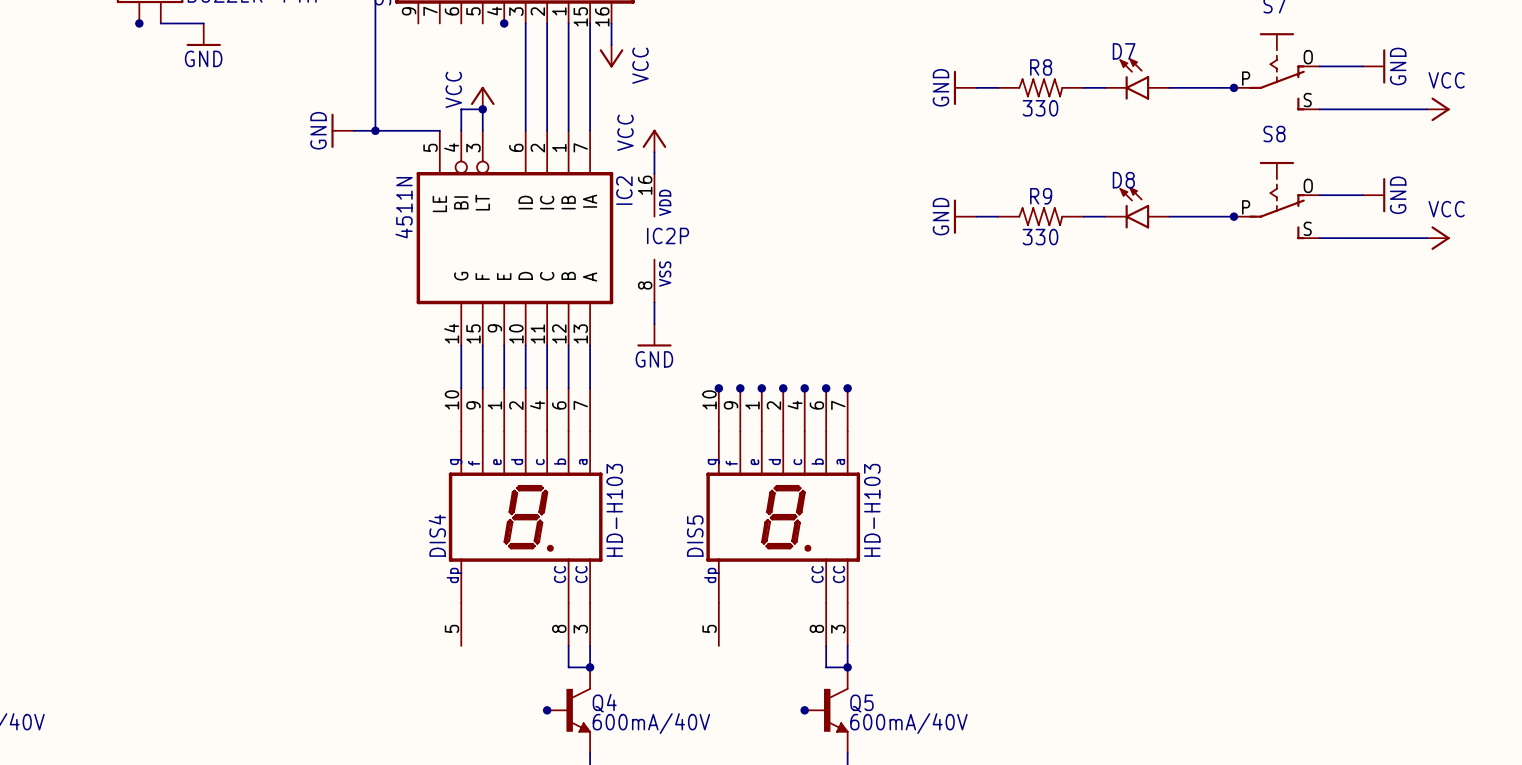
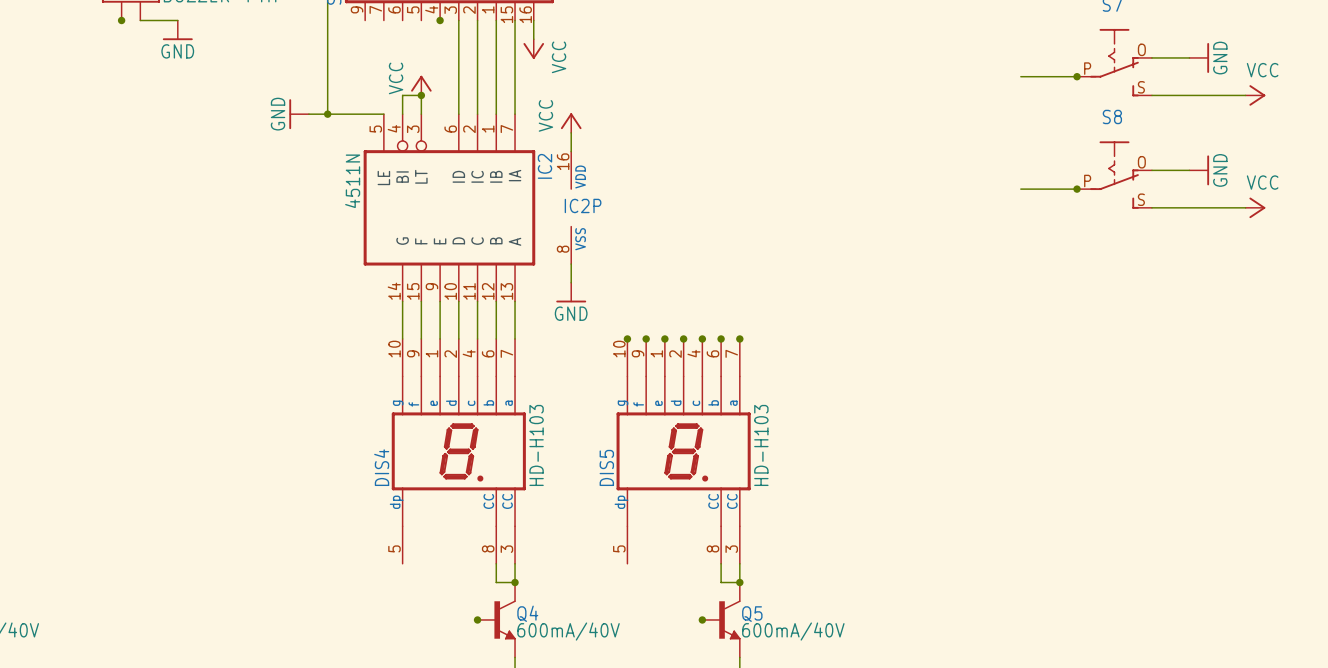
D7: (1137, 78) -> none
power symbol: GND (965, 87) -> none
wire: (976, 87) (997, 87) -> none
R8: 330 (1040, 87) -> none
wire: (1083, 87) (1105, 87) -> none
D8: (1137, 207) -> none
power symbol: GND (965, 216) -> none
wire: (976, 216) (997, 216) -> none
R9: 330 (1040, 216) -> none
wire: (1083, 216) (1105, 216) -> none

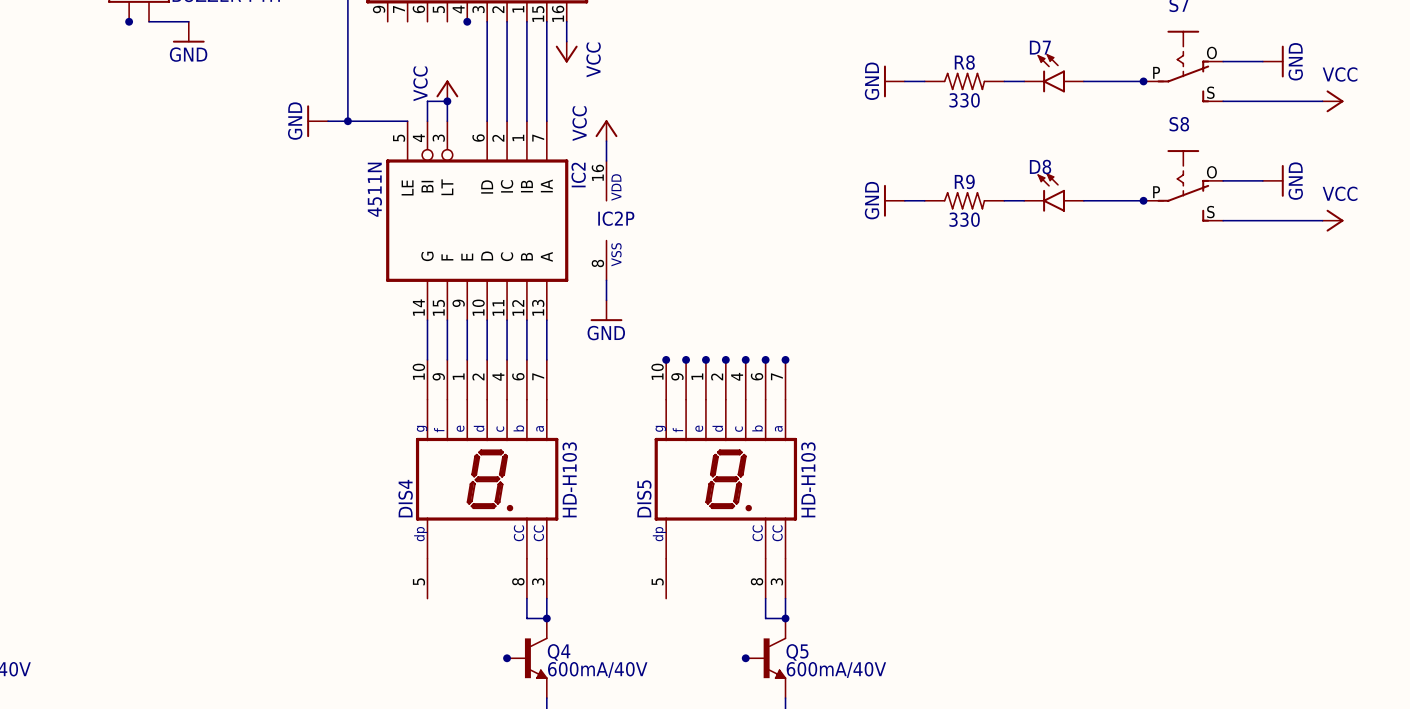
D7: none -> (1054, 73)
power symbol: none -> GND (894, 81)
wire: none -> (904, 81) (924, 81)
R8: none -> 330 (964, 81)
wire: none -> (1004, 81) (1024, 81)
D8: none -> (1054, 192)
power symbol: none -> GND (894, 200)
wire: none -> (904, 200) (924, 200)
R9: none -> 330 (964, 200)
wire: none -> (1004, 200) (1024, 200)

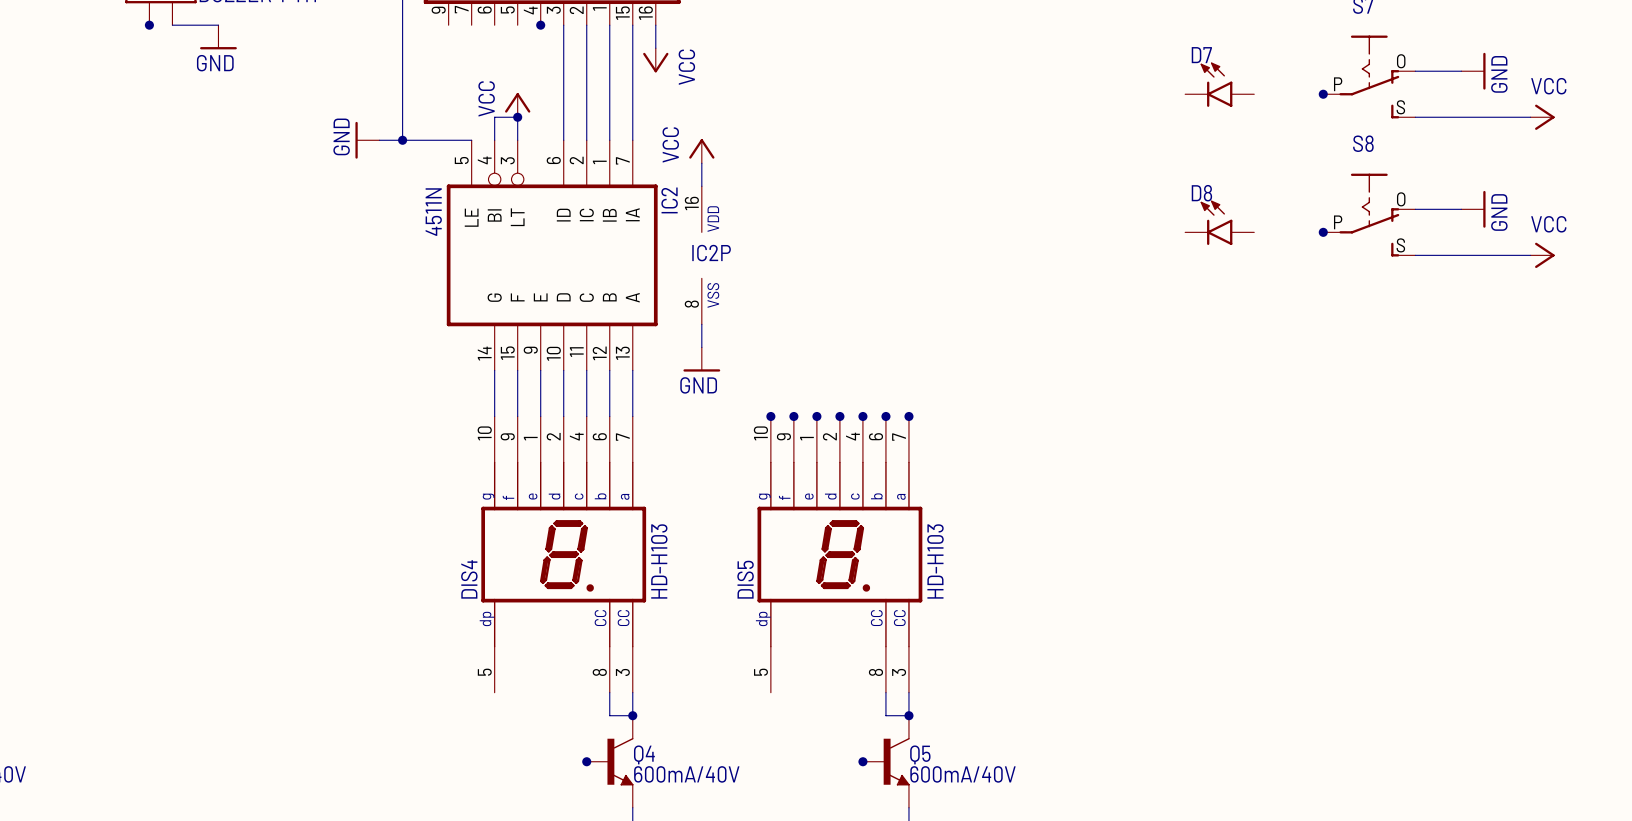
power symbol: GND (894, 81) -> none
wire: (904, 81) (924, 81) -> none
R8: 330 (964, 81) -> none
wire: (1004, 81) (1024, 81) -> none
wire: (1083, 81) (1143, 81) -> none
power symbol: GND (894, 200) -> none
wire: (904, 200) (924, 200) -> none
R9: 330 (964, 200) -> none
wire: (1004, 200) (1024, 200) -> none
wire: (1083, 200) (1143, 200) -> none

